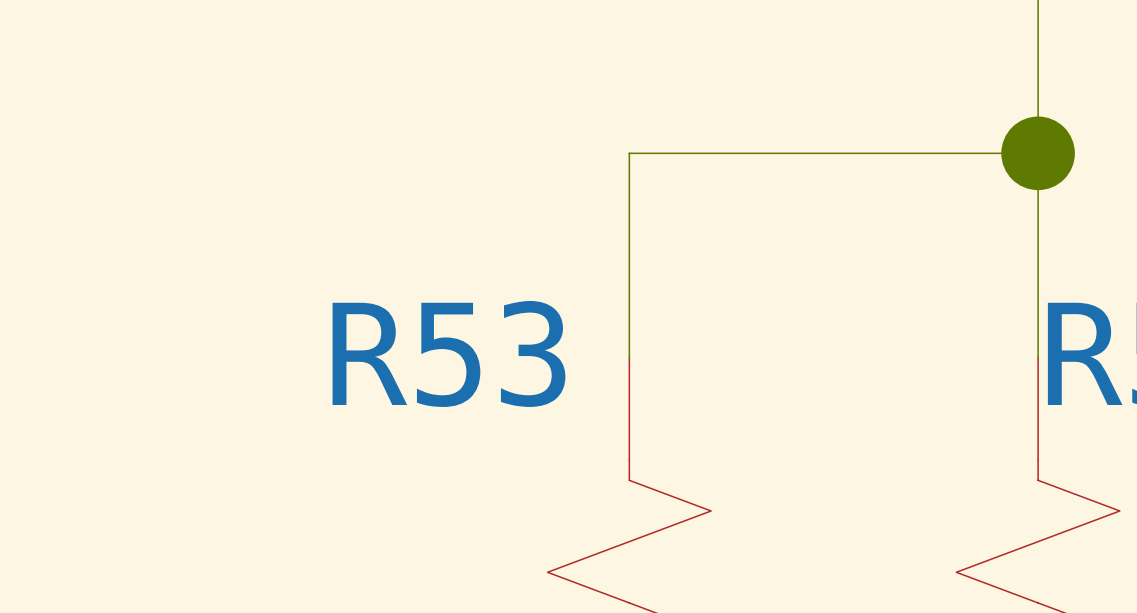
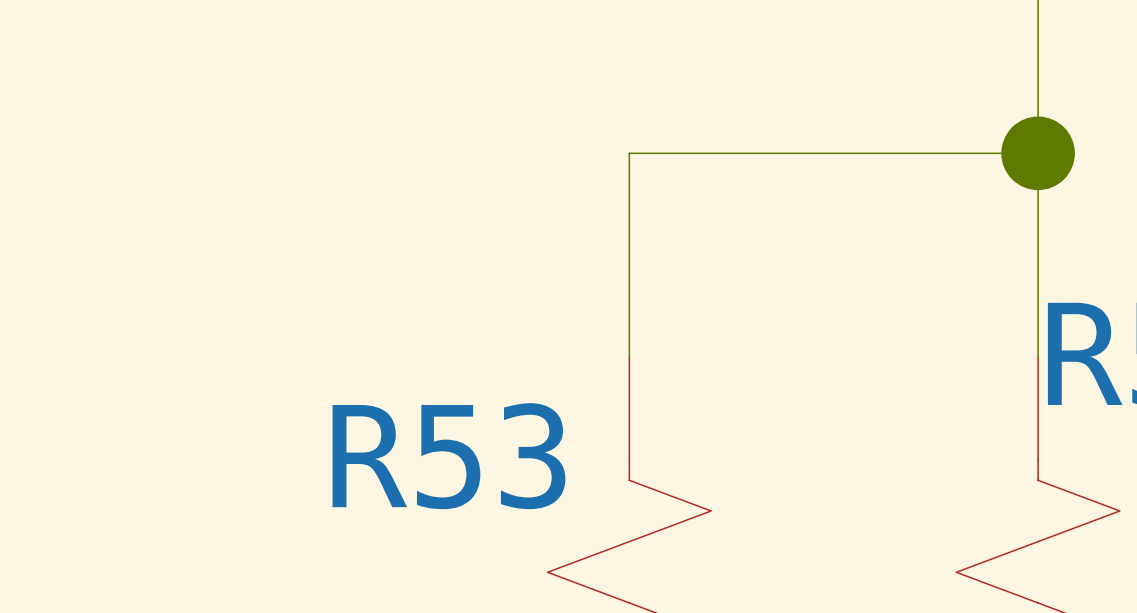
R53 name position: R53 (448, 353) -> R53 (448, 456)

